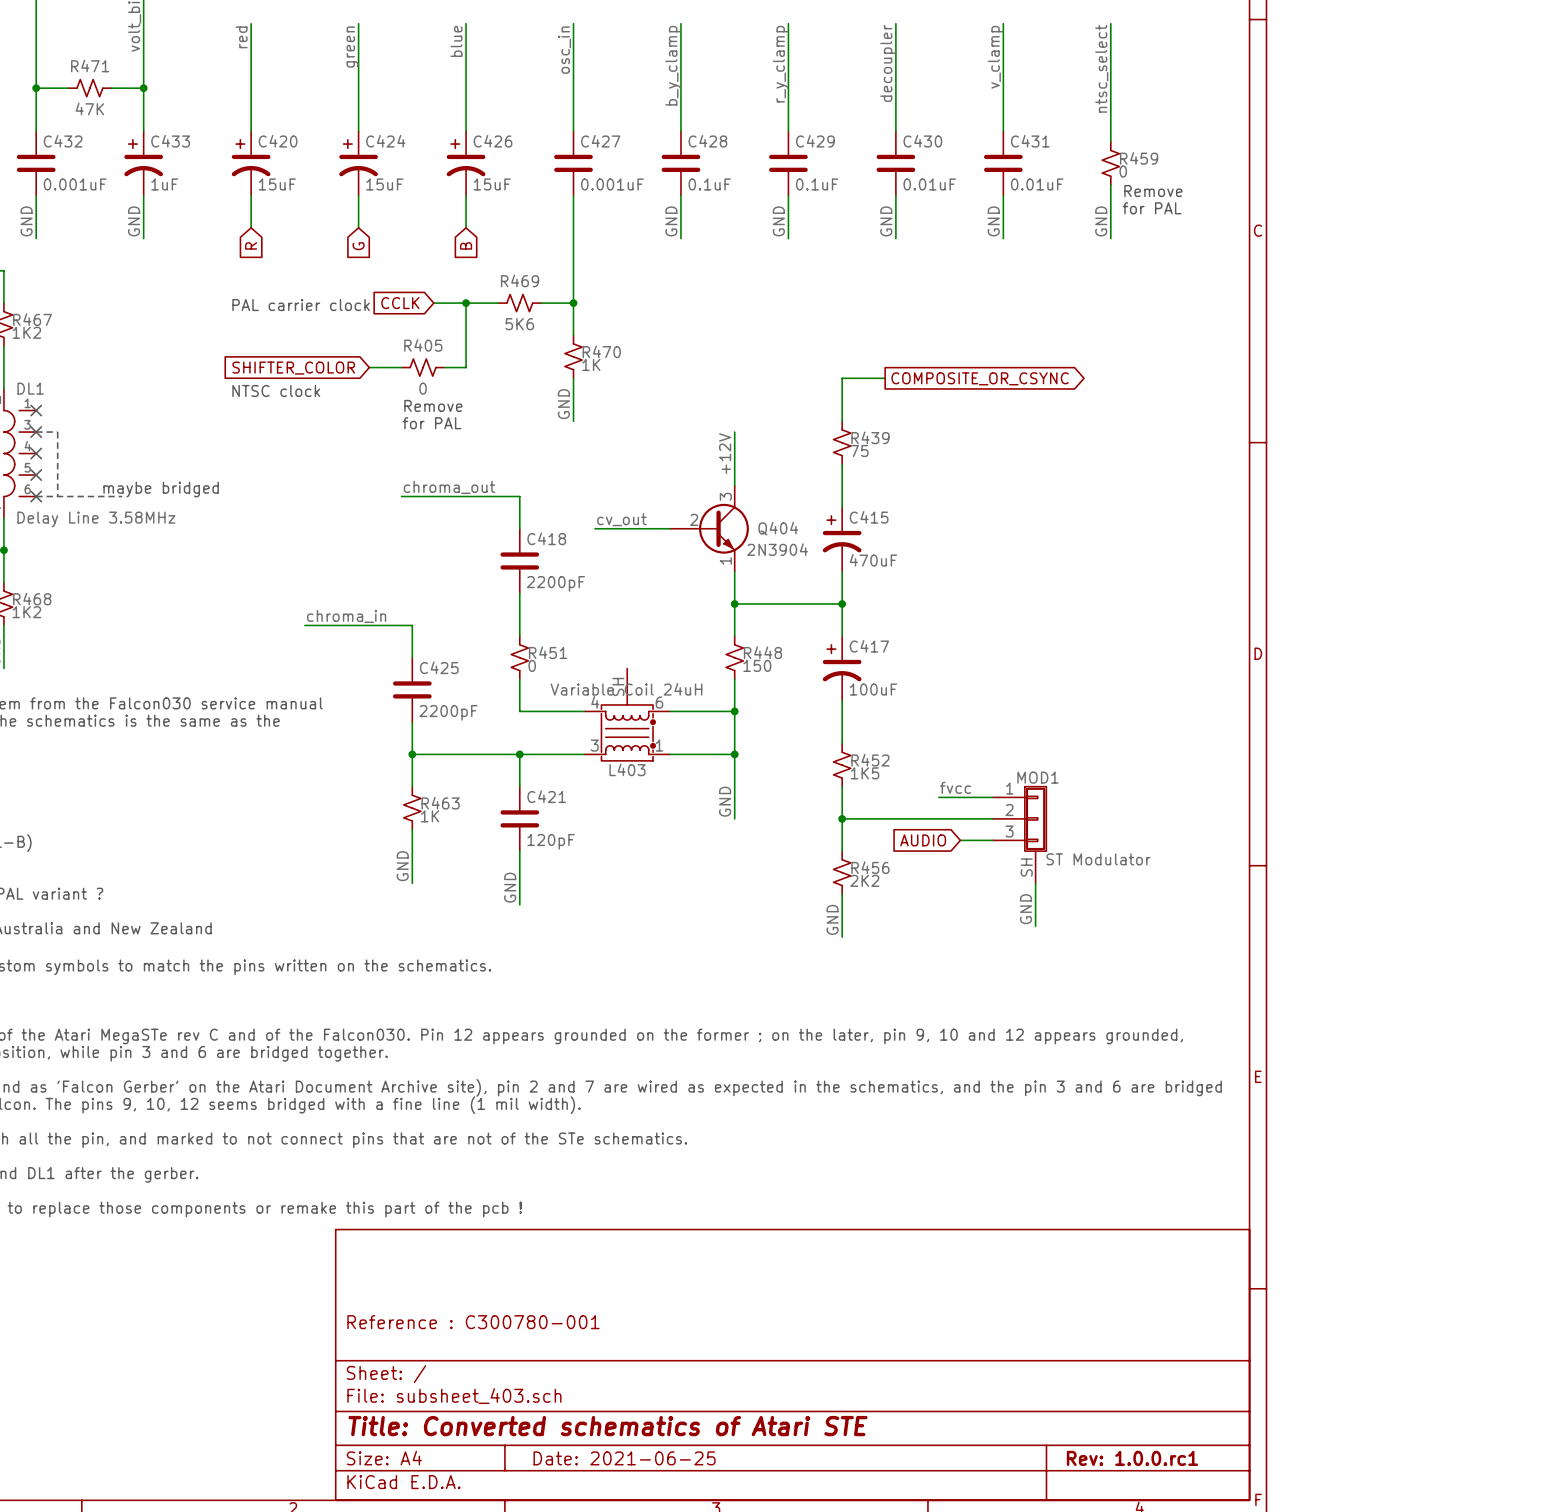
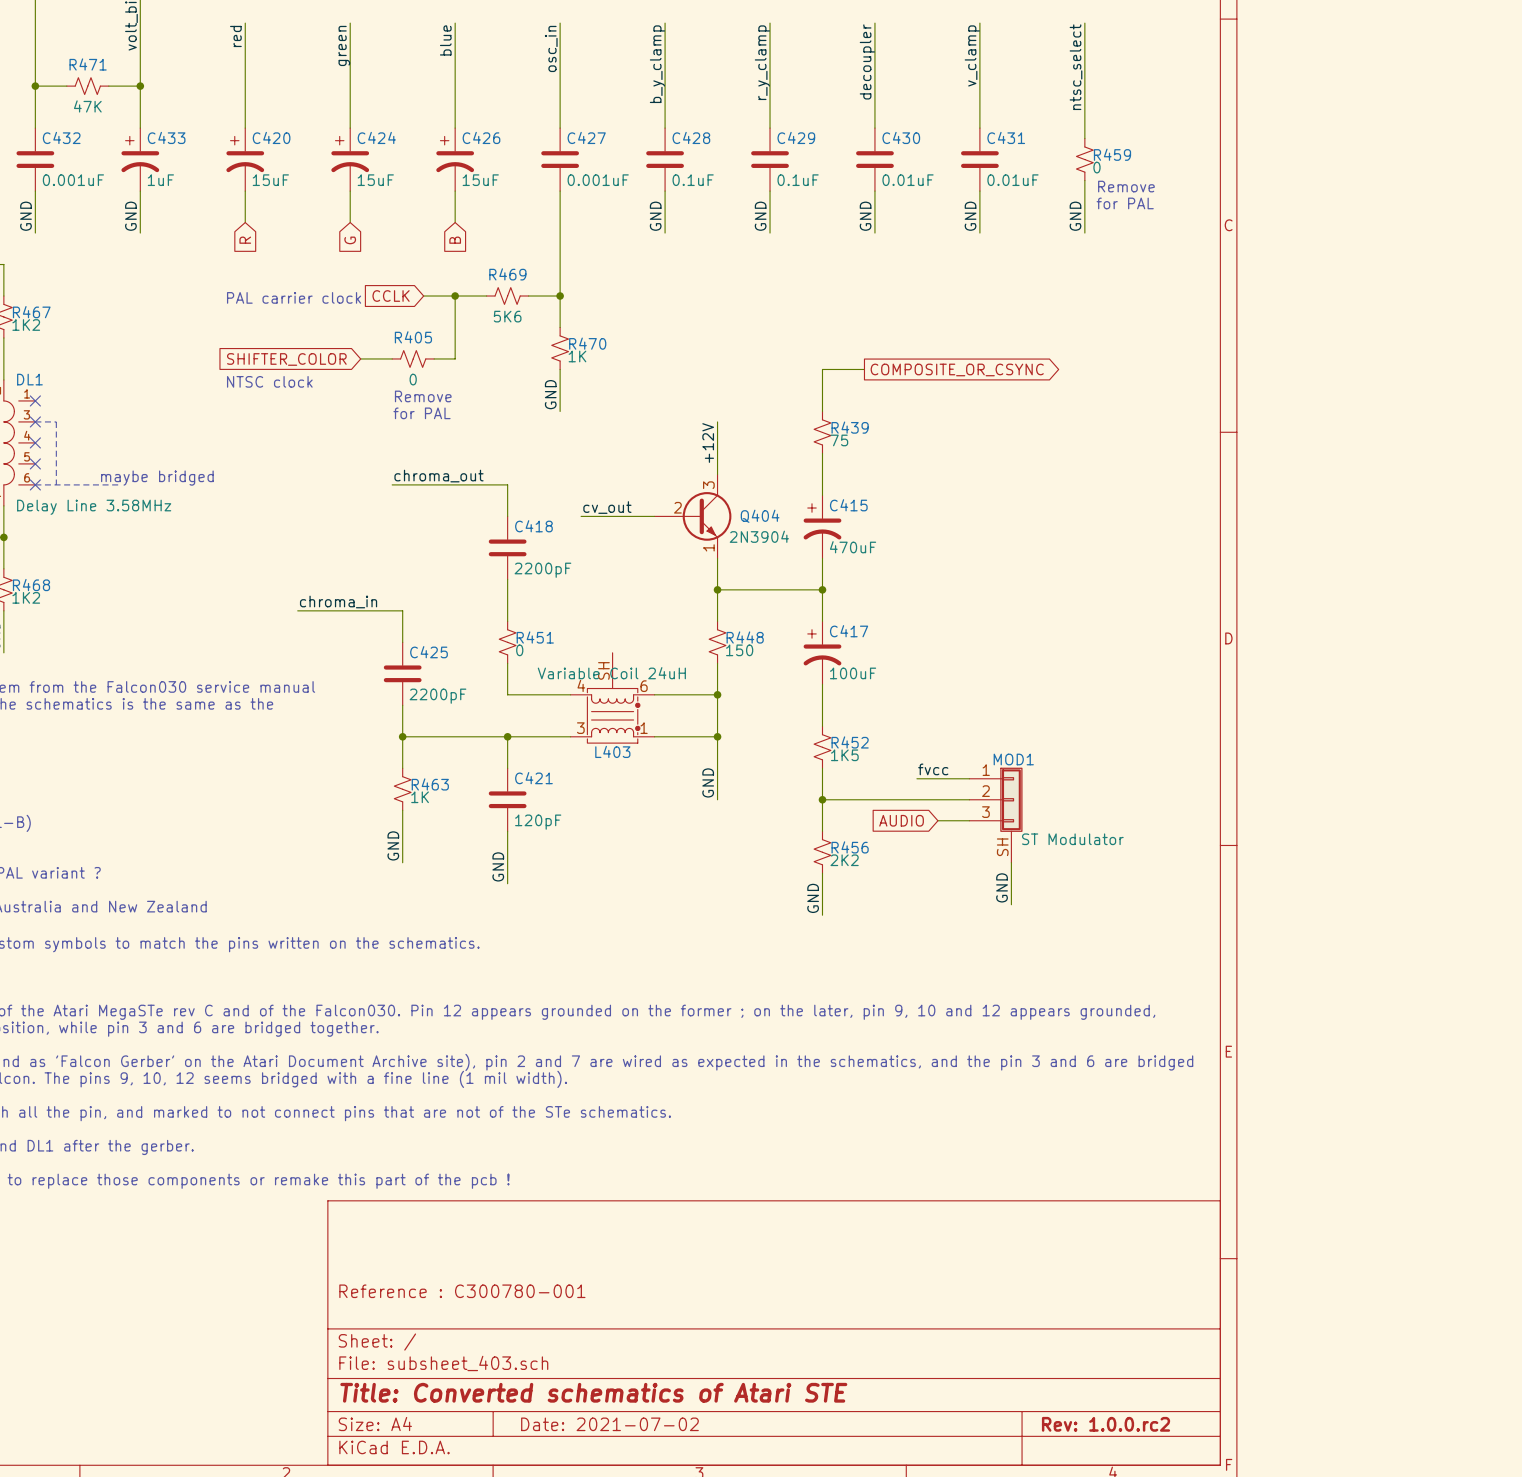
title block: Date: 2021-06-25 (624, 1458) -> Date: 2021-07-02 (609, 1424)
title block: Rev: 1.0.0.rc1 (1132, 1458) -> Rev: 1.0.0.rc2 (1106, 1424)

